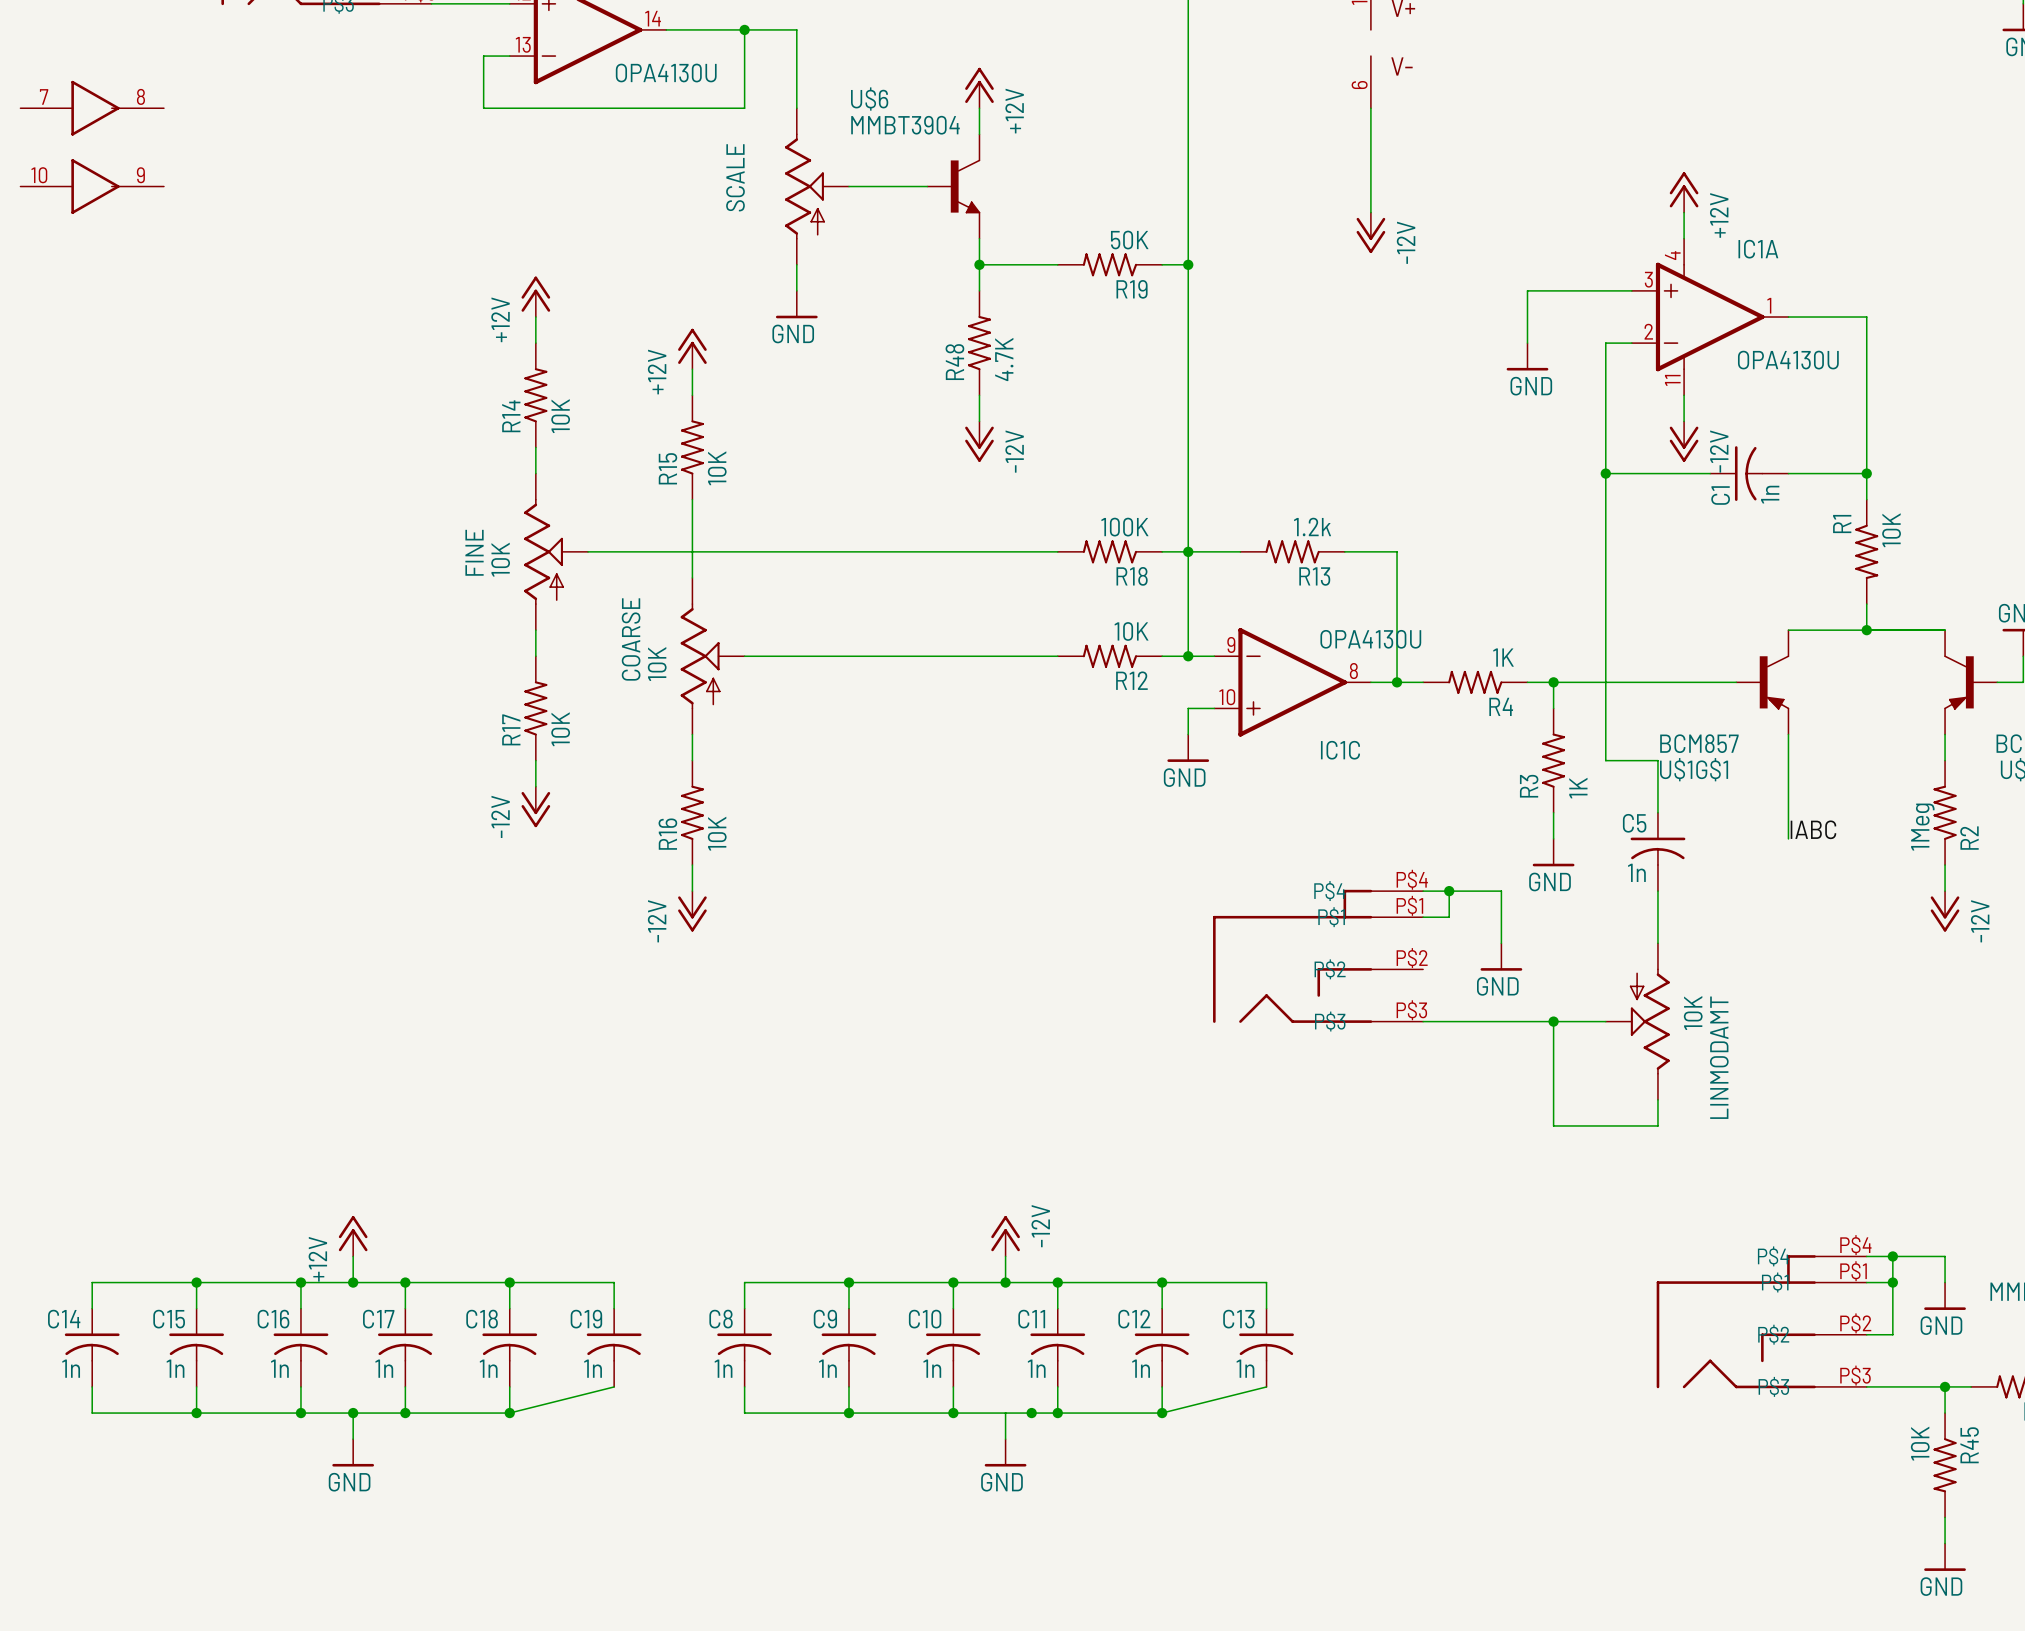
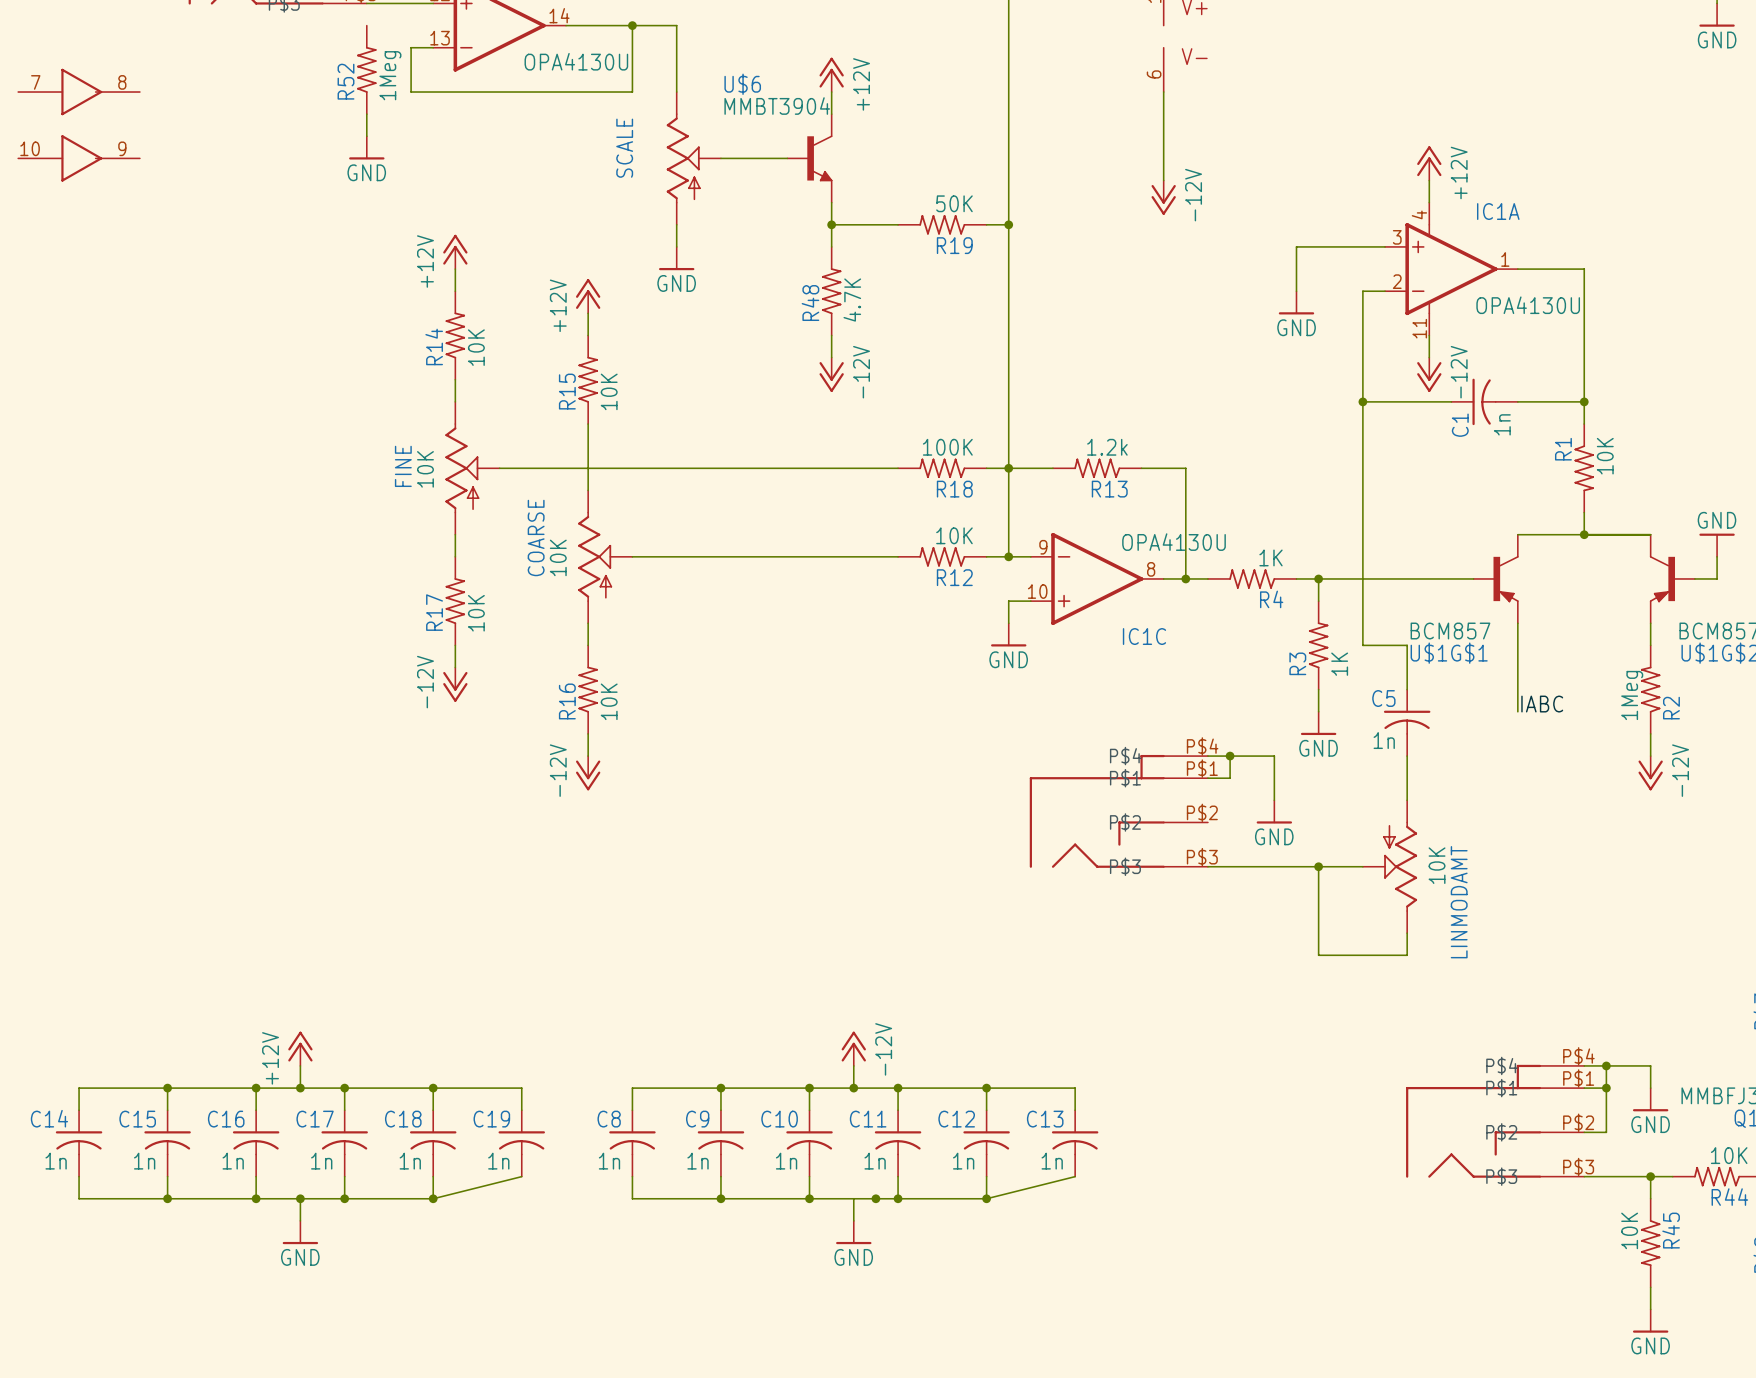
R52: none -> 1Meg (366, 69)
wire: none -> (366, 114) (366, 136)
power symbol: none -> GND (366, 147)

